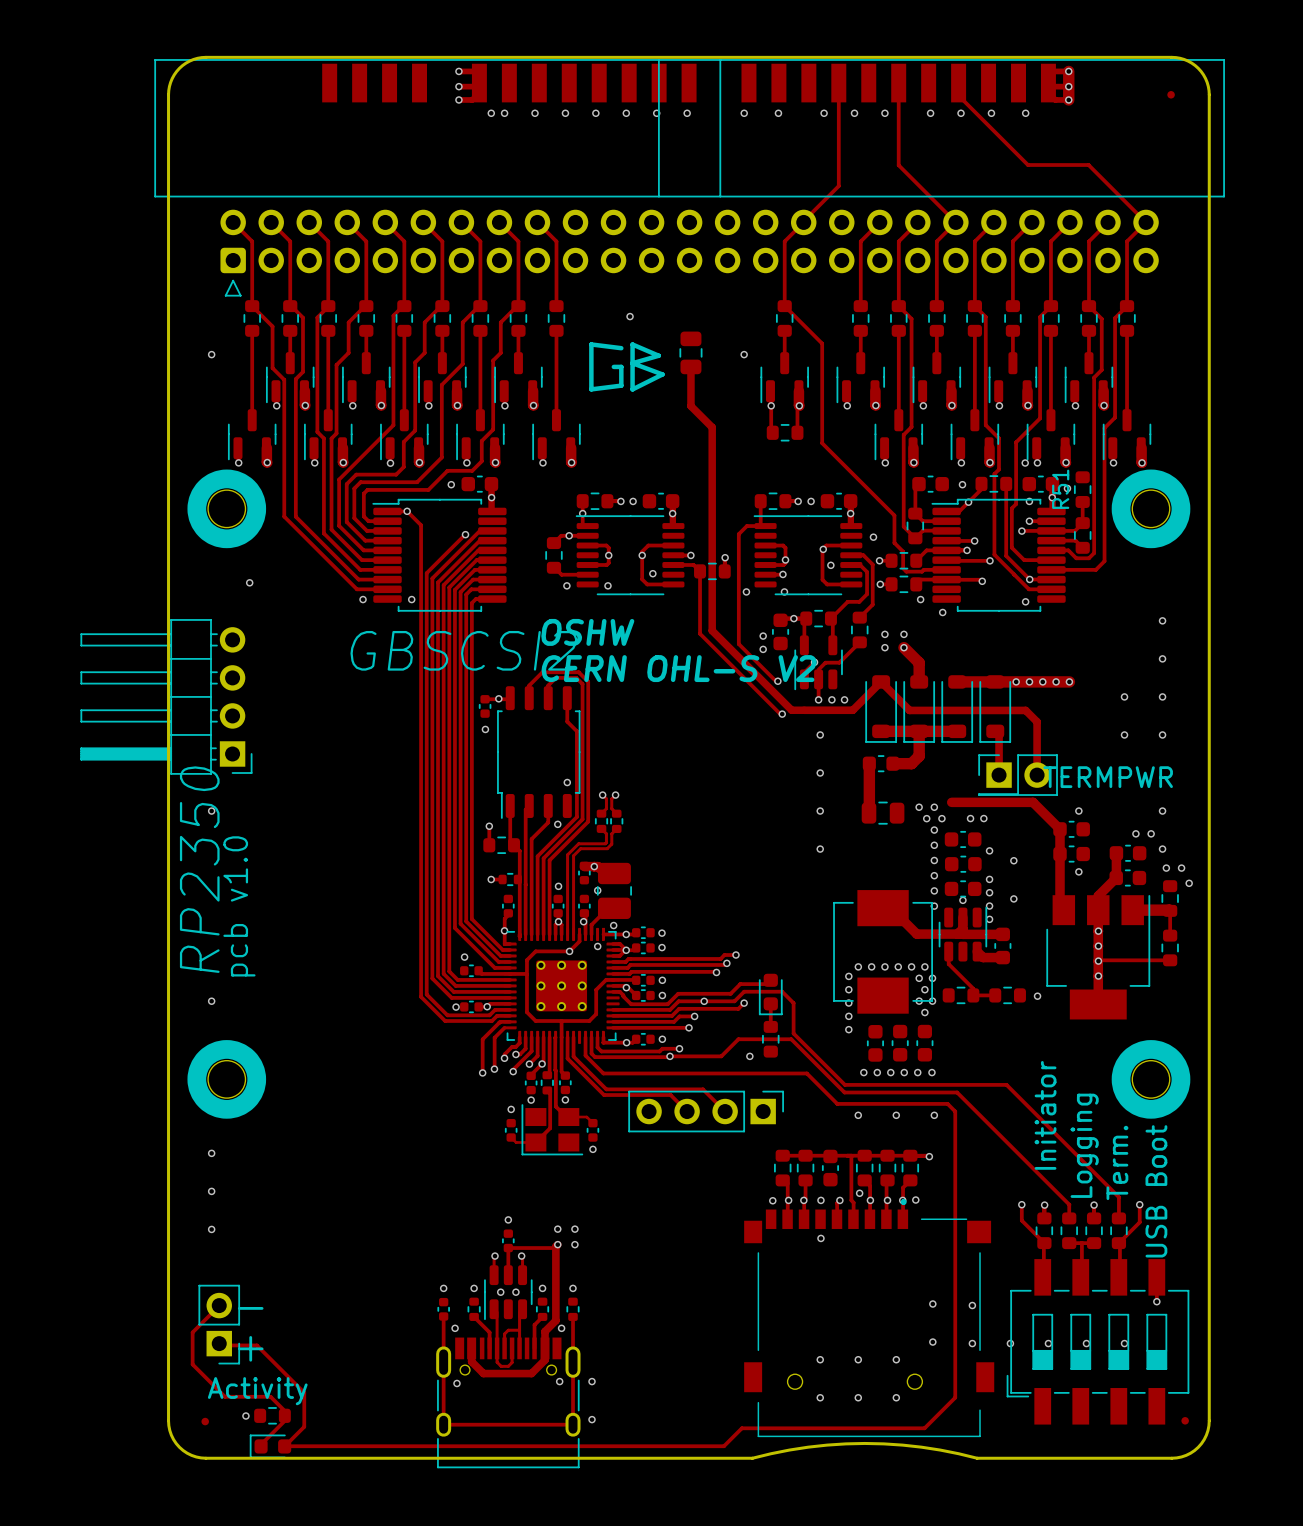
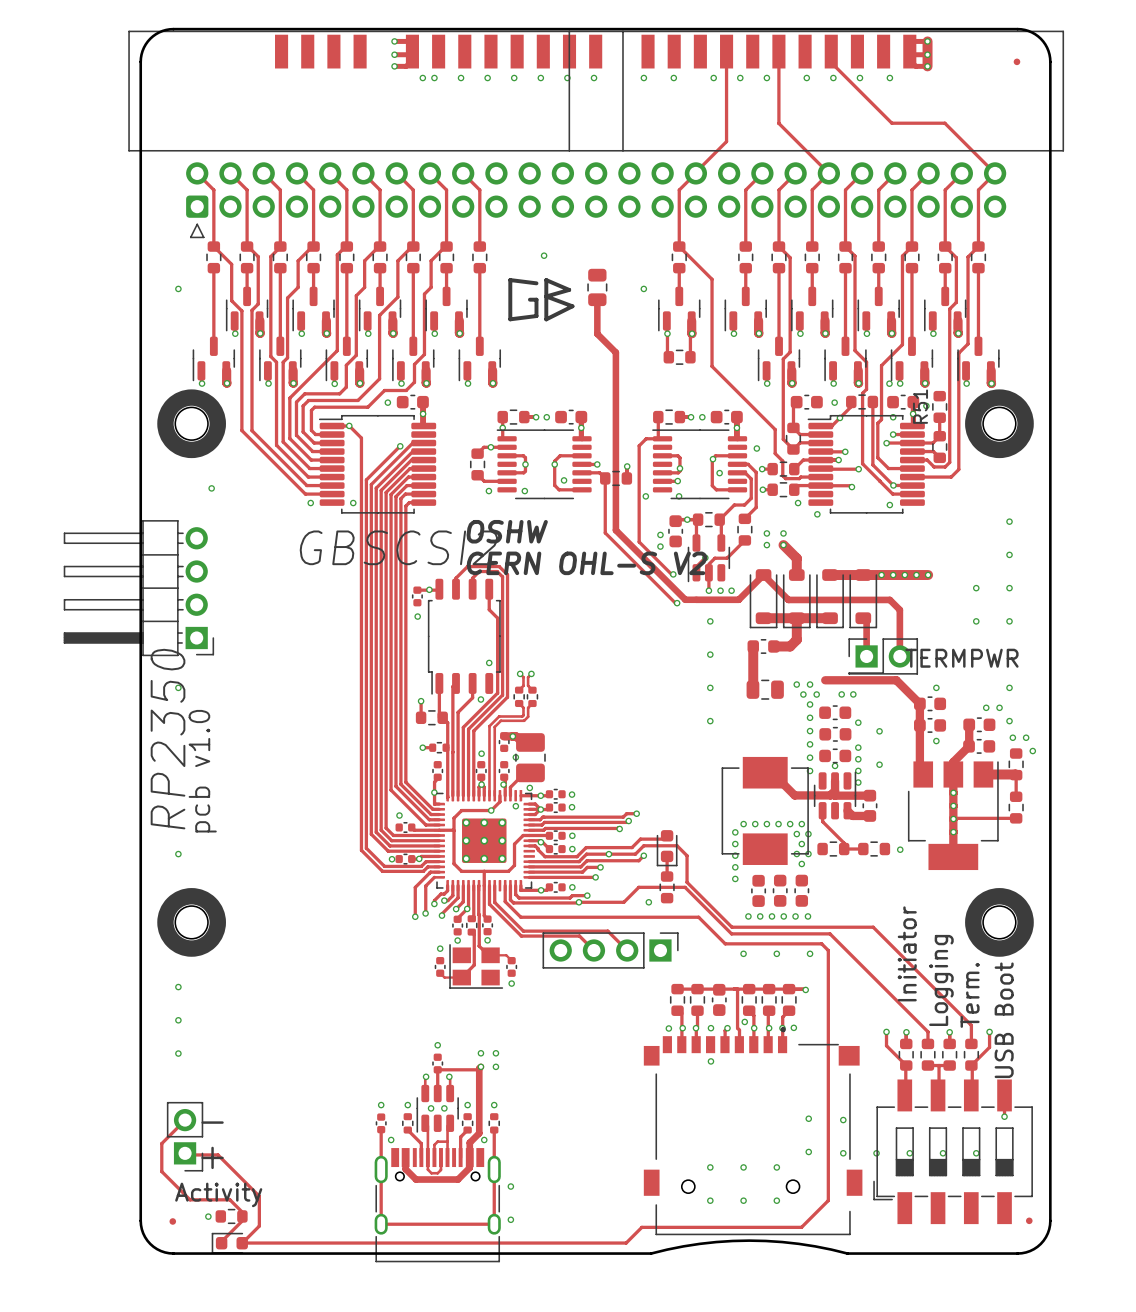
via: (559, 1381) -> none
via: (456, 1383) -> none

